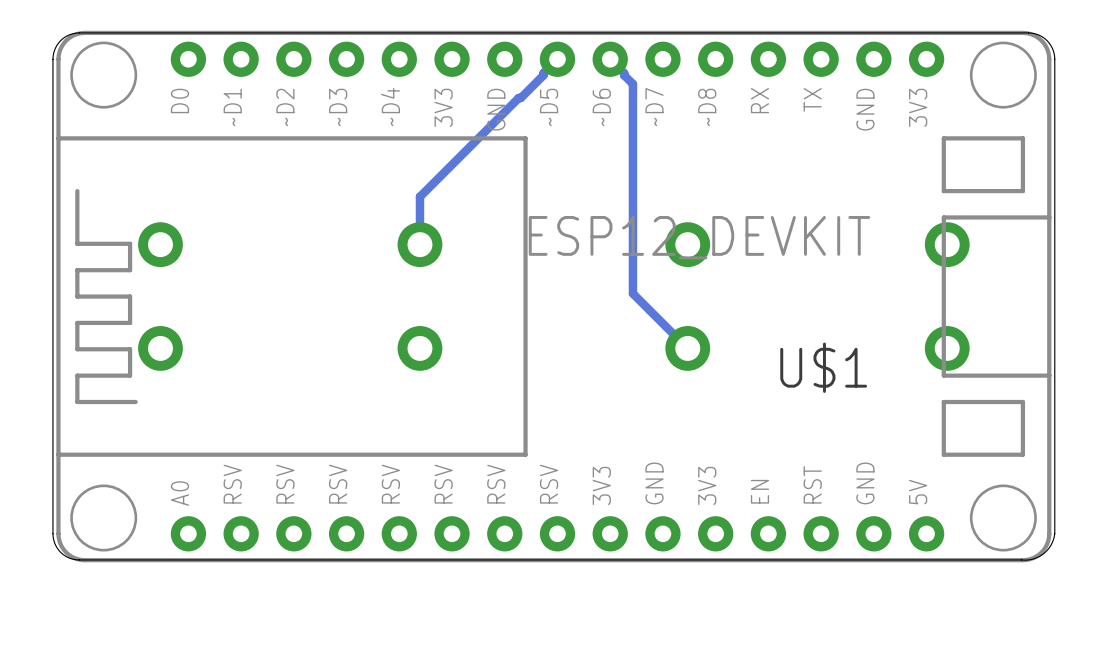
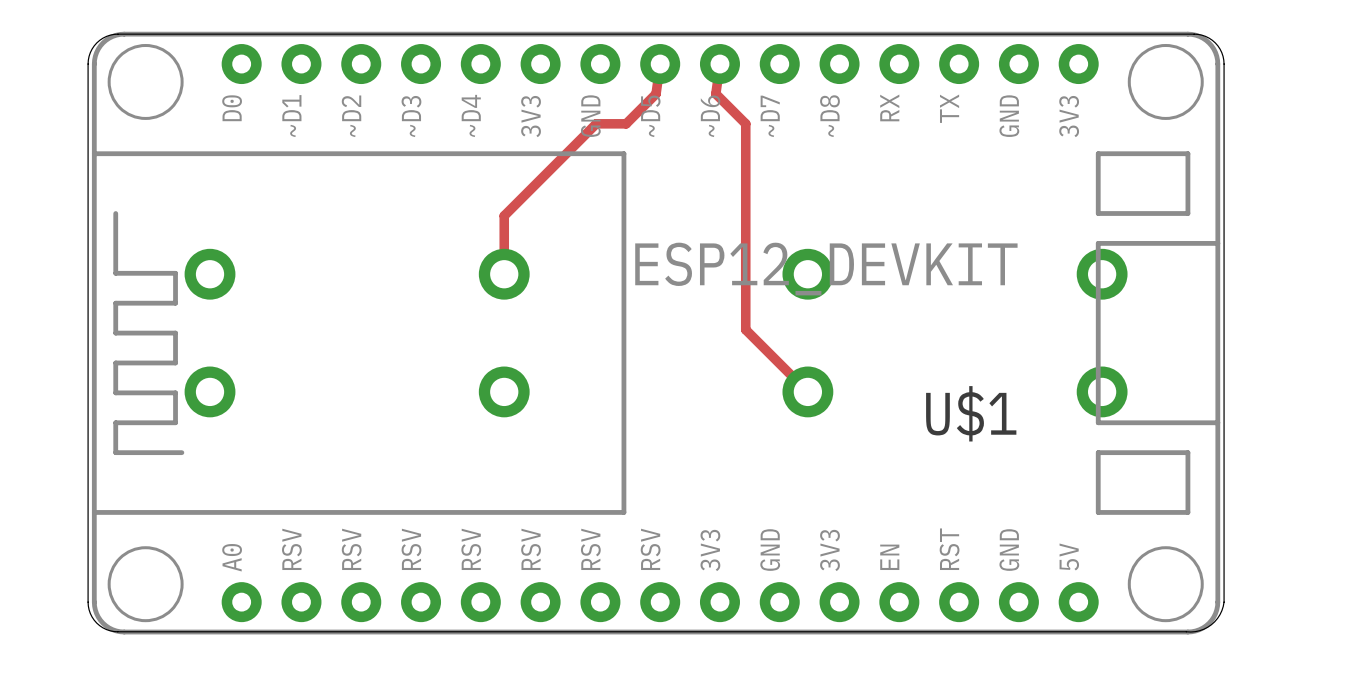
bottom track: (557, 59) (419, 196) (419, 244) -> none
top track: none -> (660, 64) (656, 93) (626, 123) (596, 123) (504, 215) (504, 274)
bottom track: (610, 59) (632, 84) (632, 293) (687, 348) -> none
top track: none -> (719, 64) (715, 93) (745, 123) (745, 329) (807, 391)

